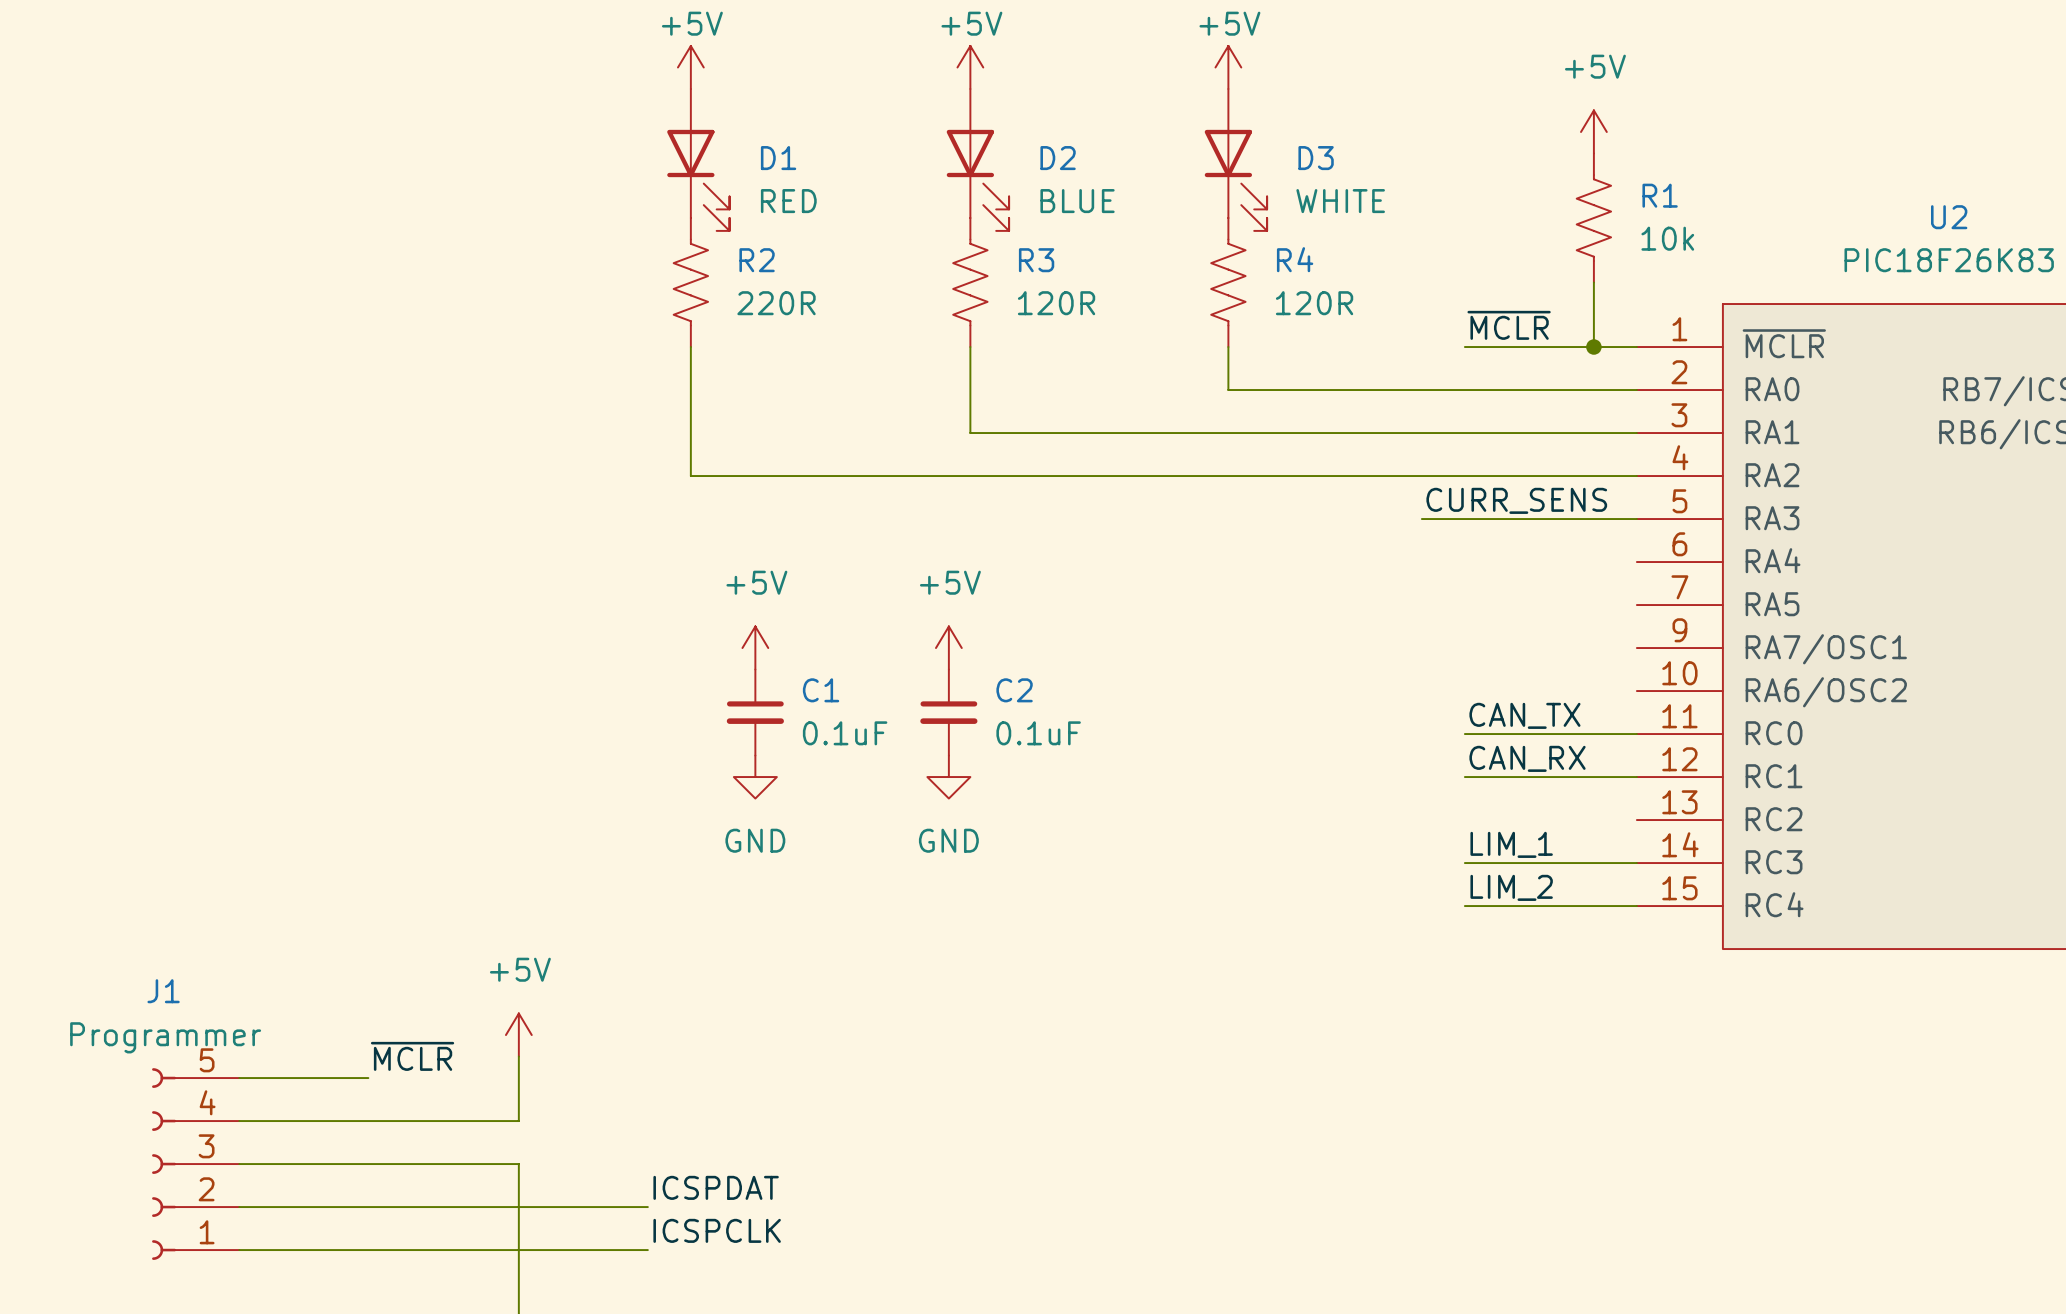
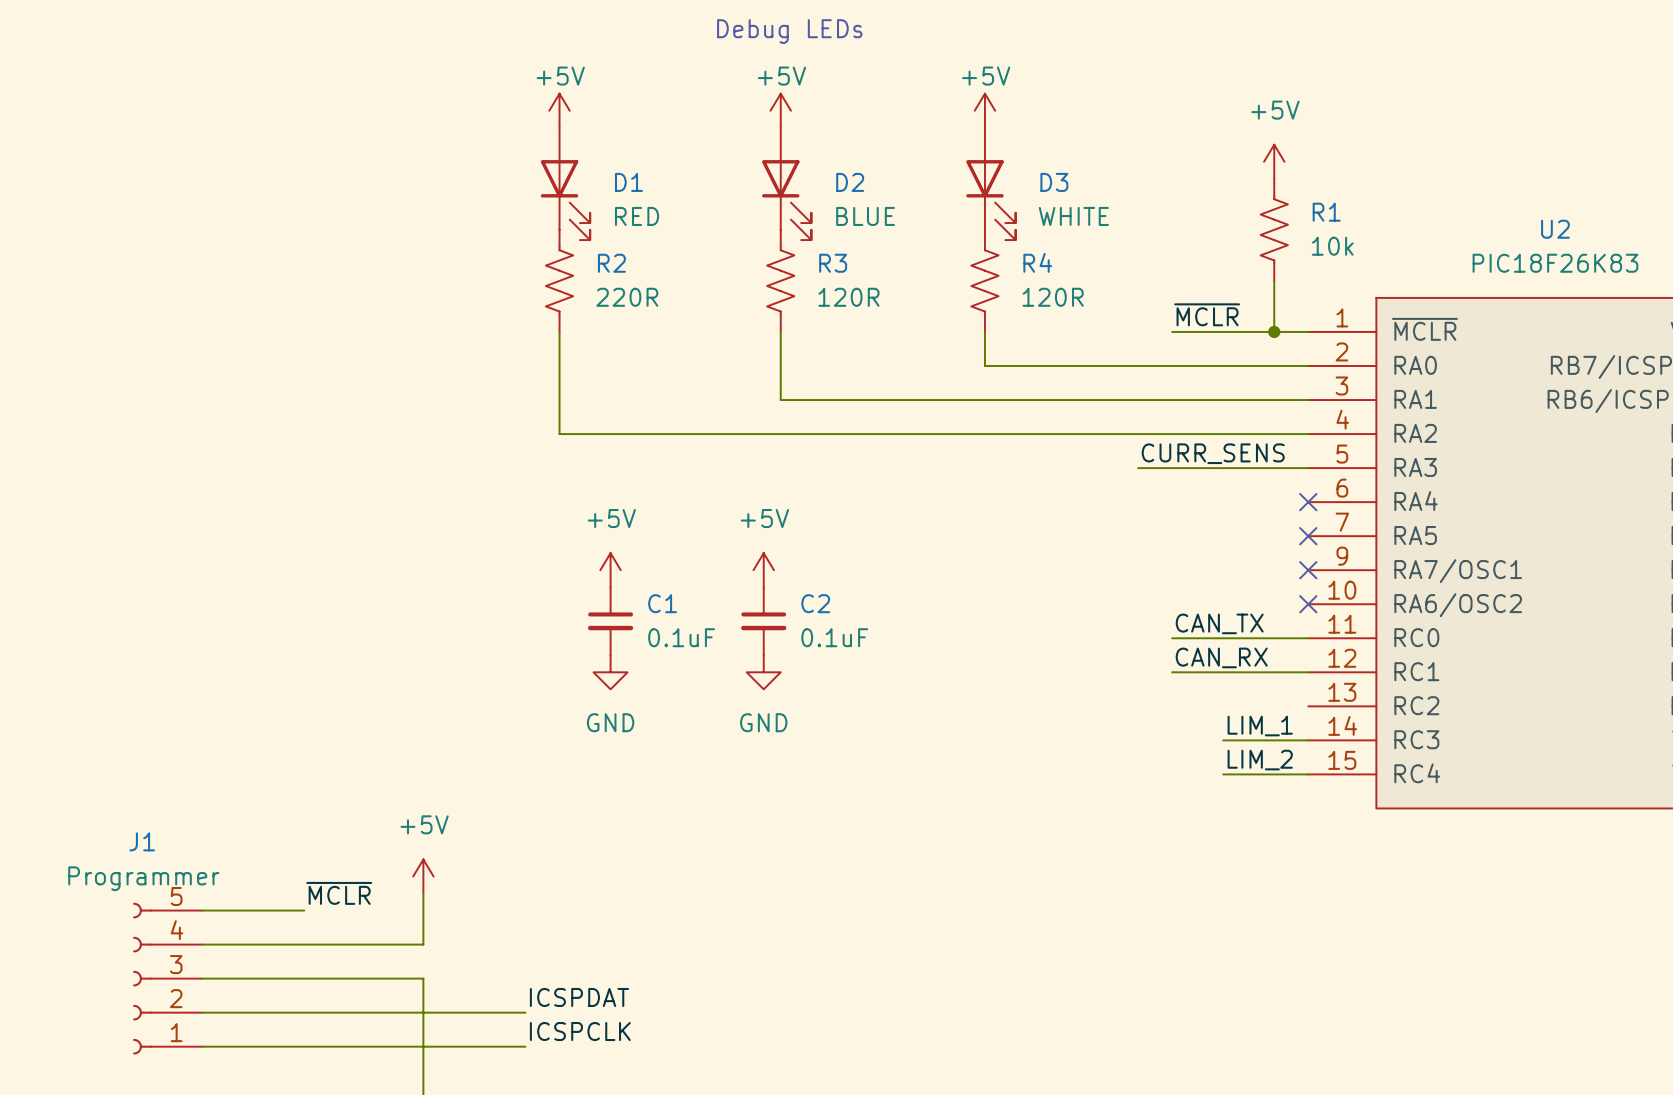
no-connect mark: none -> (1308, 502)
no-connect mark: none -> (1308, 536)
no-connect mark: none -> (1308, 570)
no-connect mark: none -> (1308, 604)
label position: LIM_1 (1511, 844) -> LIM_1 (1260, 726)
wire: (1464, 863) (1529, 863) -> none
label position: LIM_2 (1511, 887) -> LIM_2 (1260, 760)
wire: (1464, 906) (1529, 906) -> none

